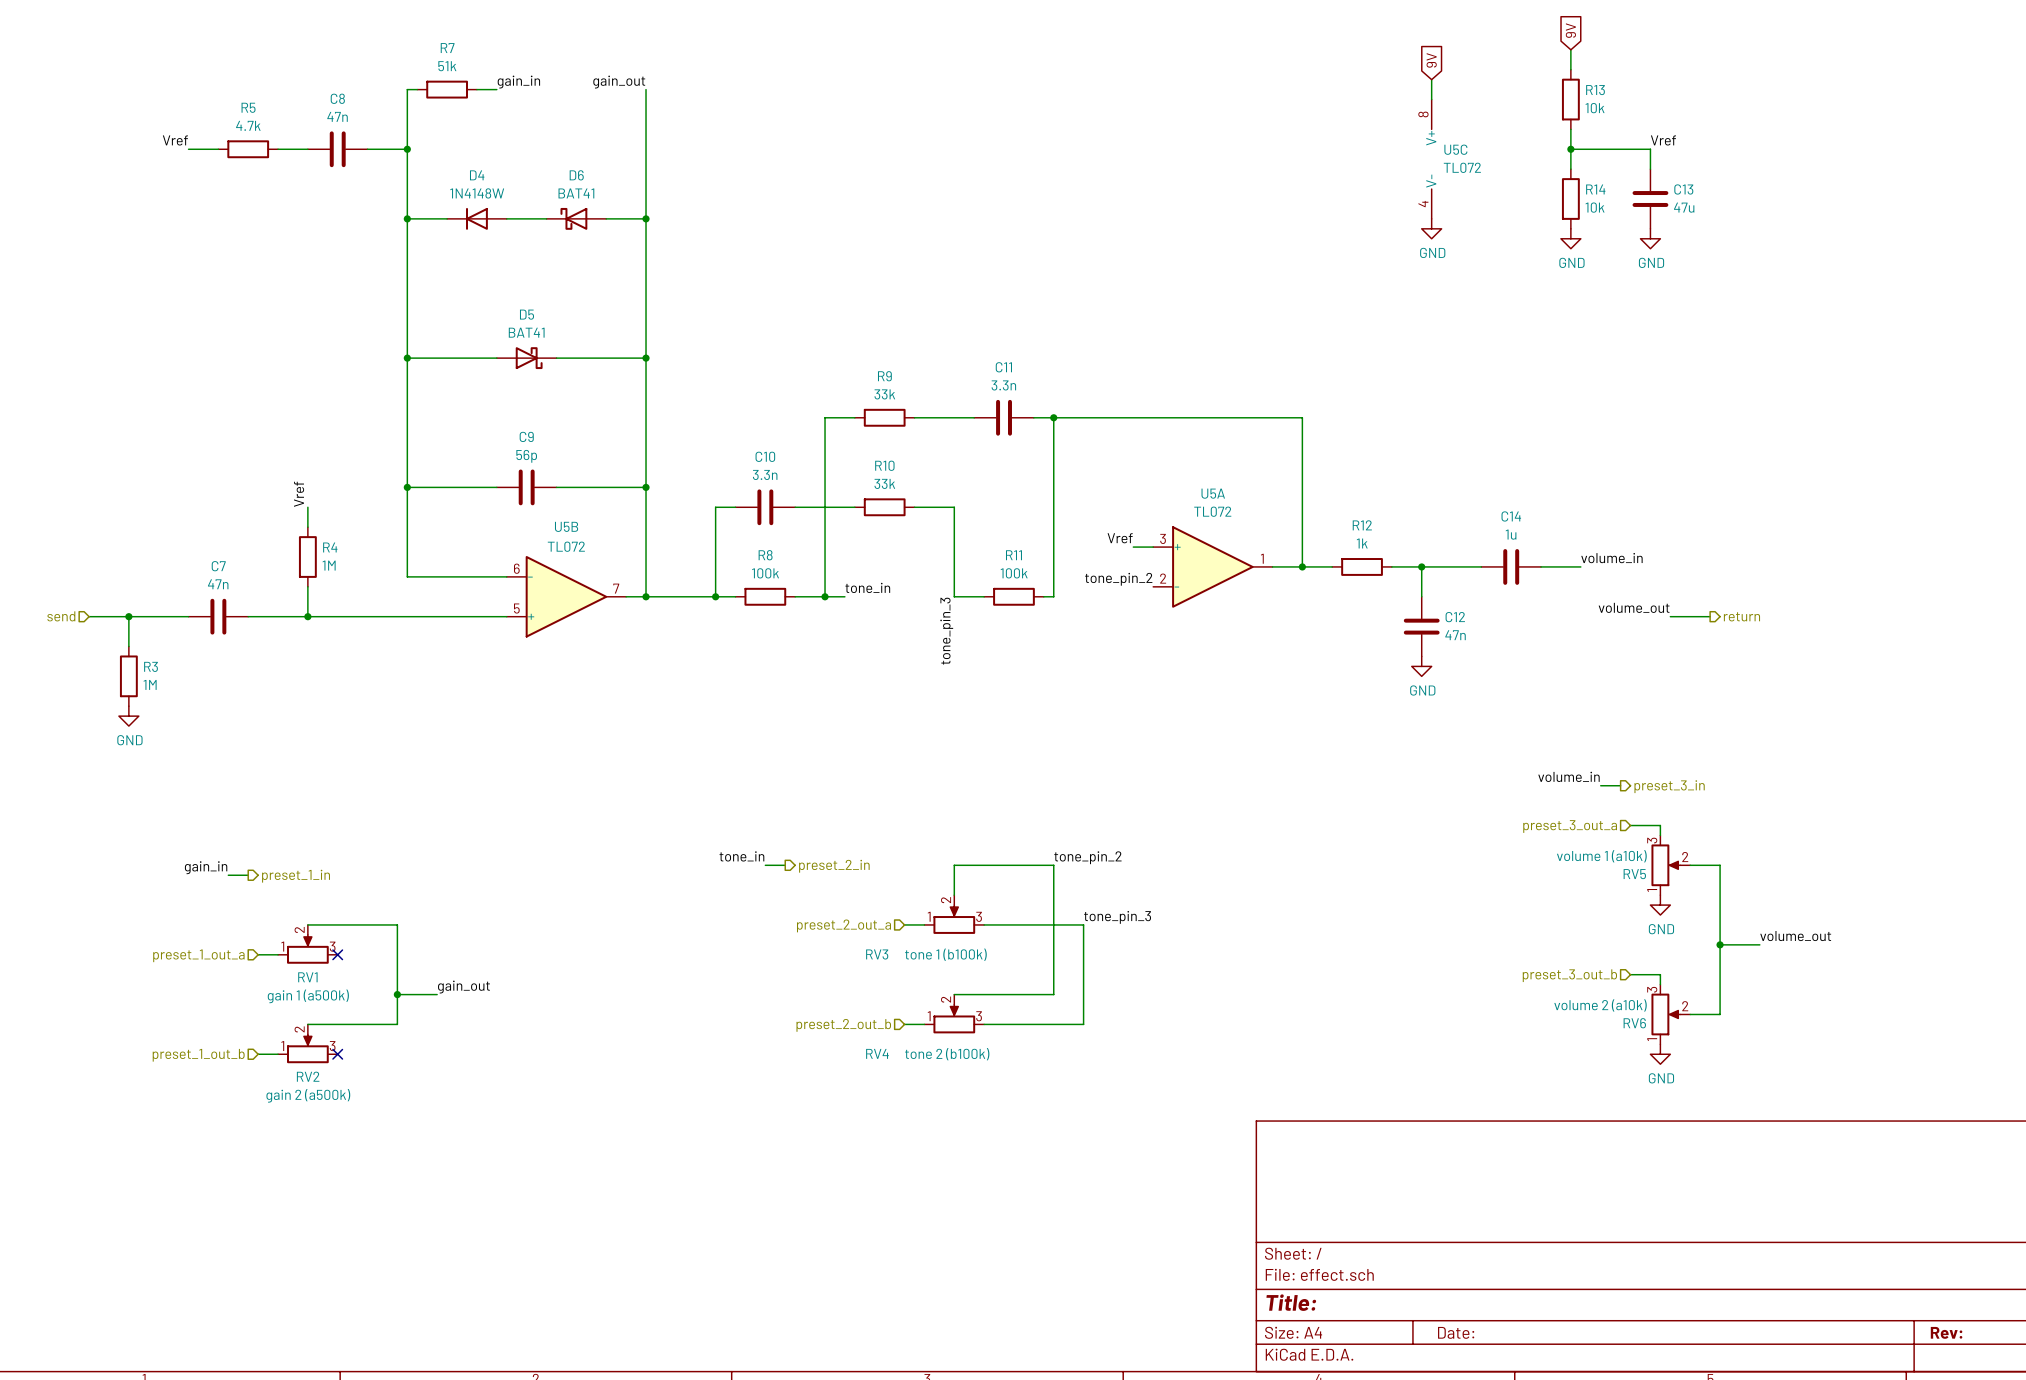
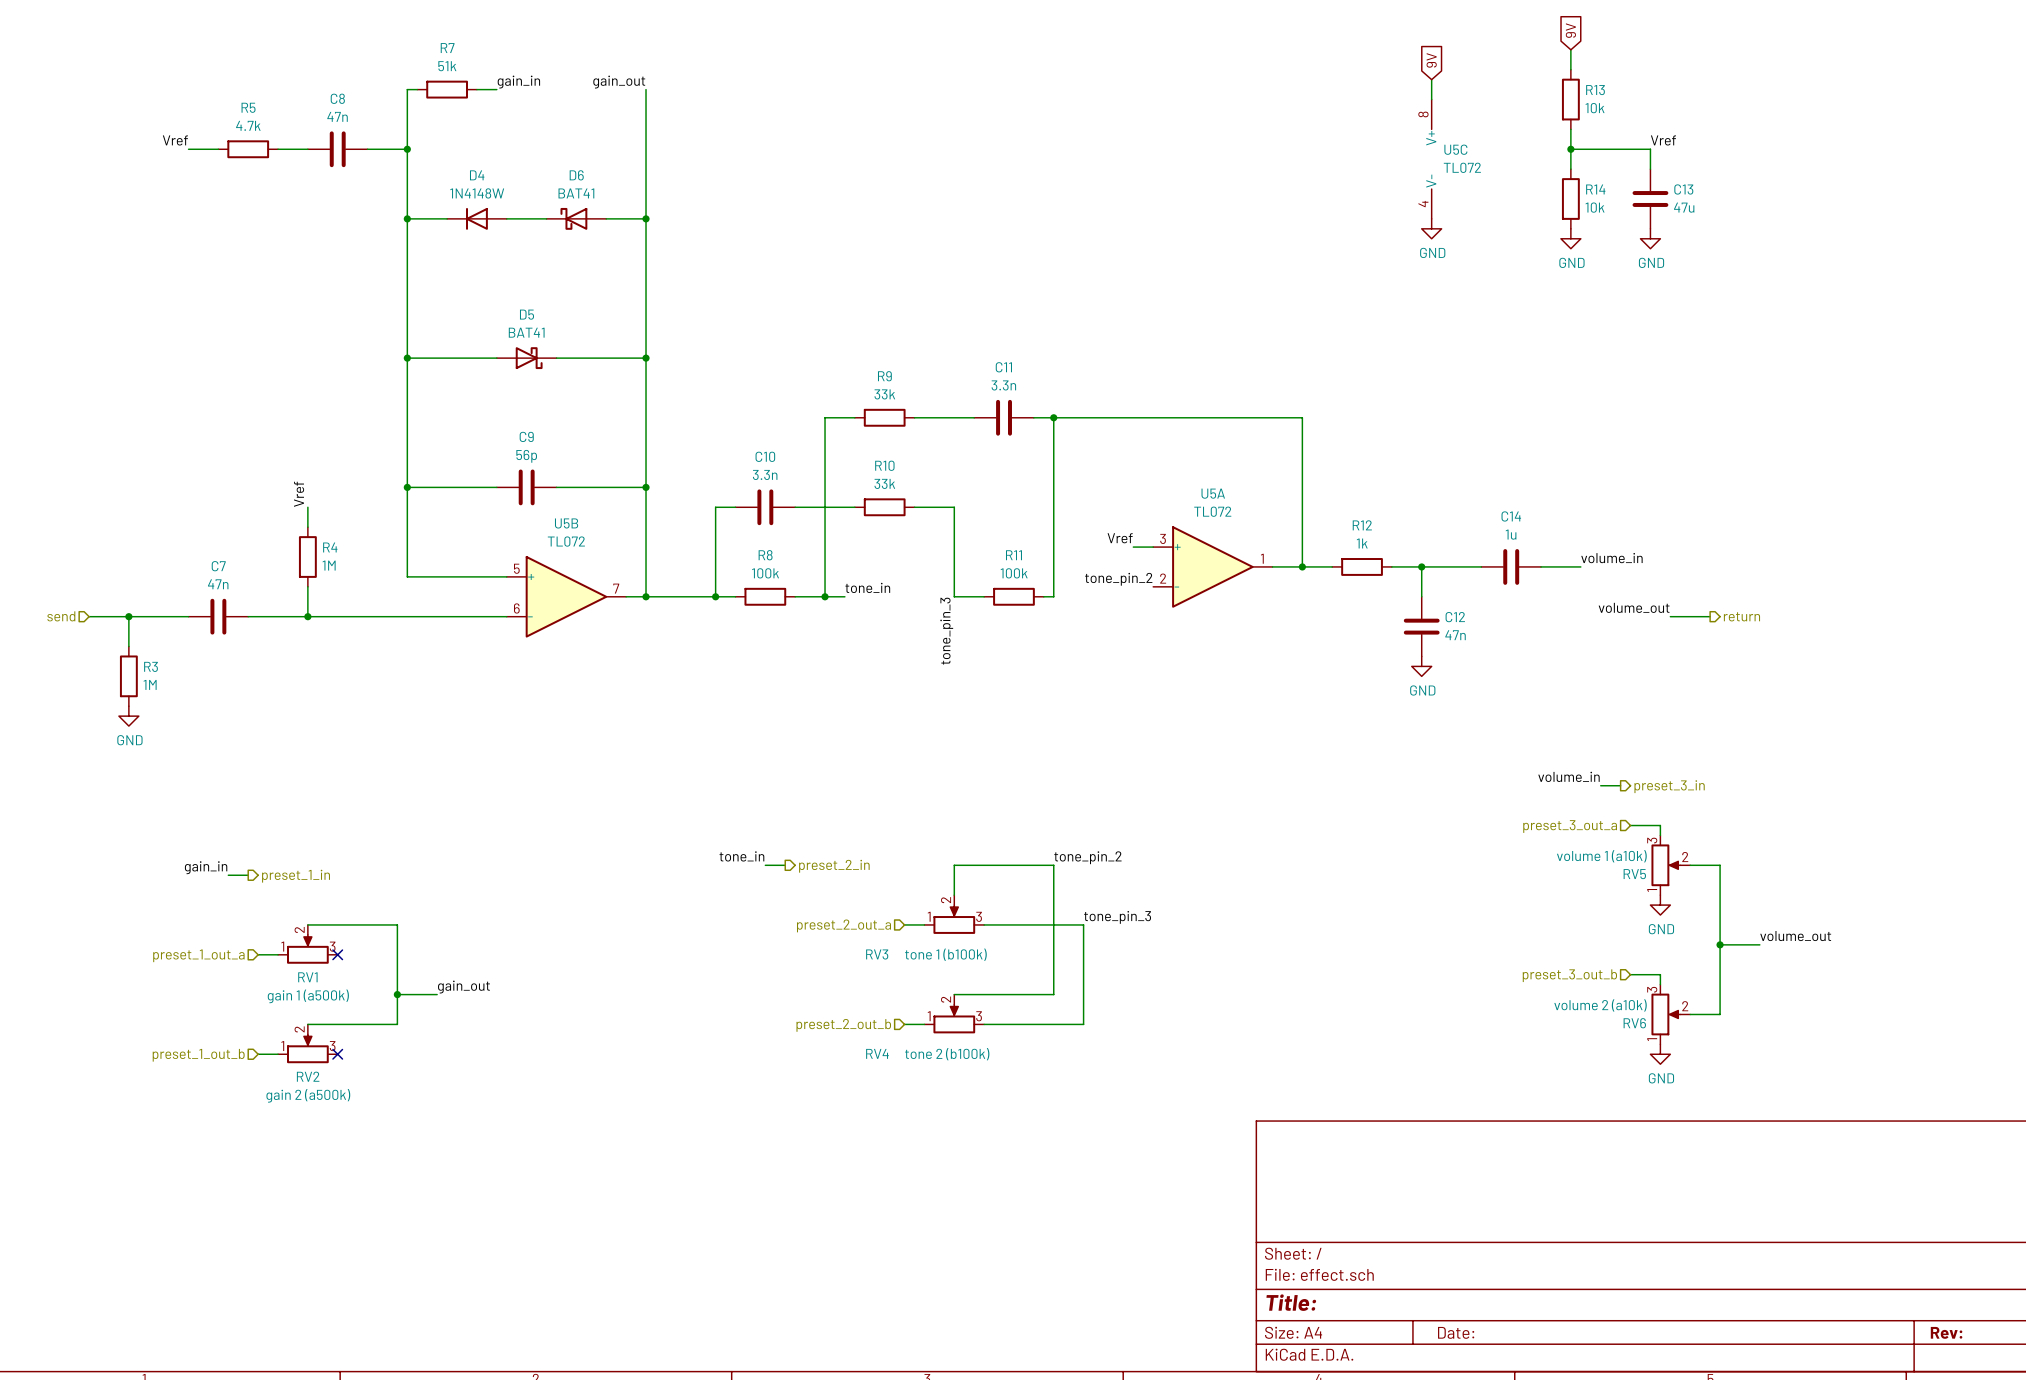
U5B flip: as is (566, 596) -> up-down (566, 596)

